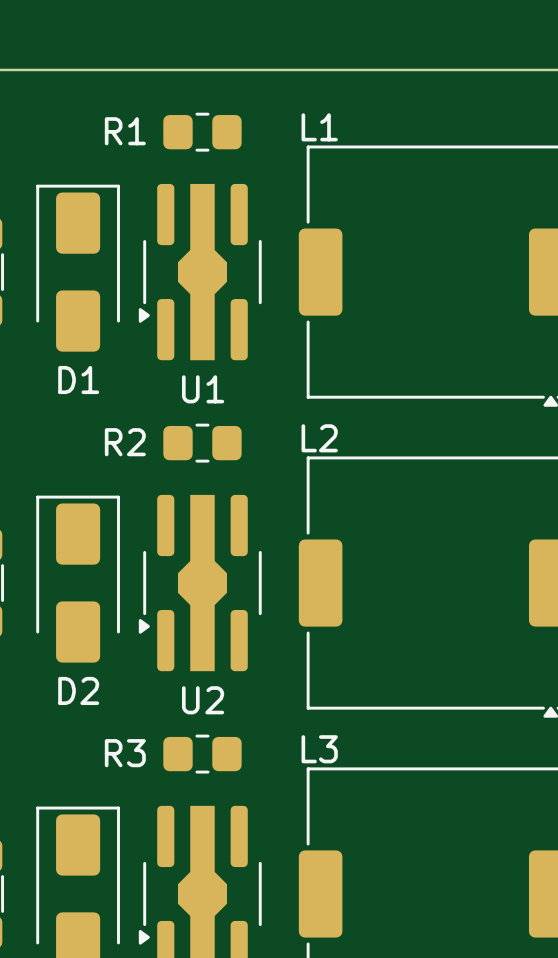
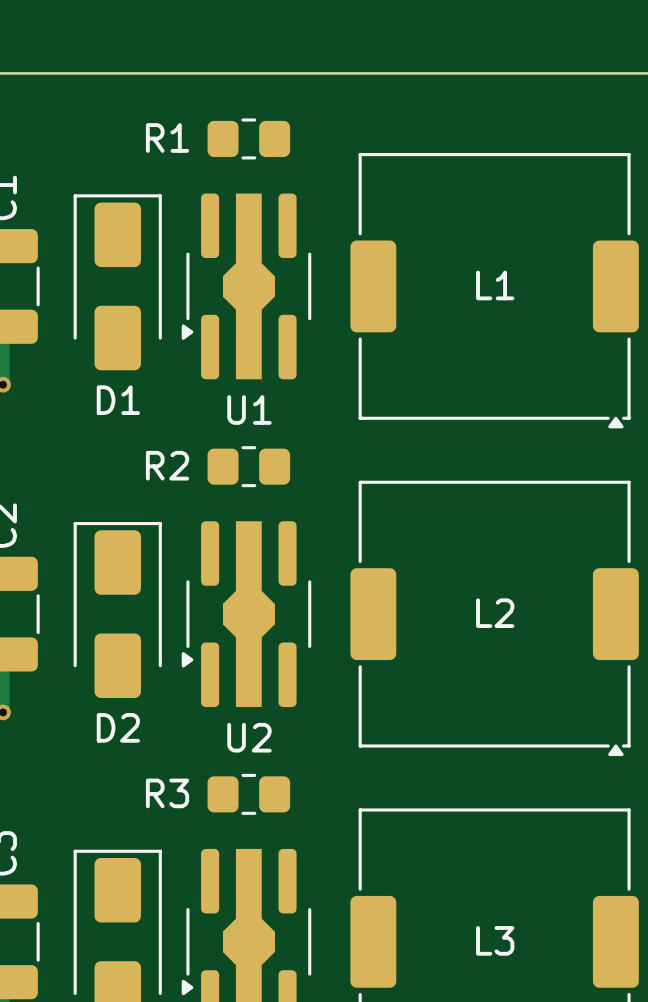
L1 name position: L1 (319, 127) -> L1 (495, 285)
L2 name position: L2 (319, 438) -> L2 (495, 613)
L3 name position: L3 (319, 749) -> L3 (495, 940)

